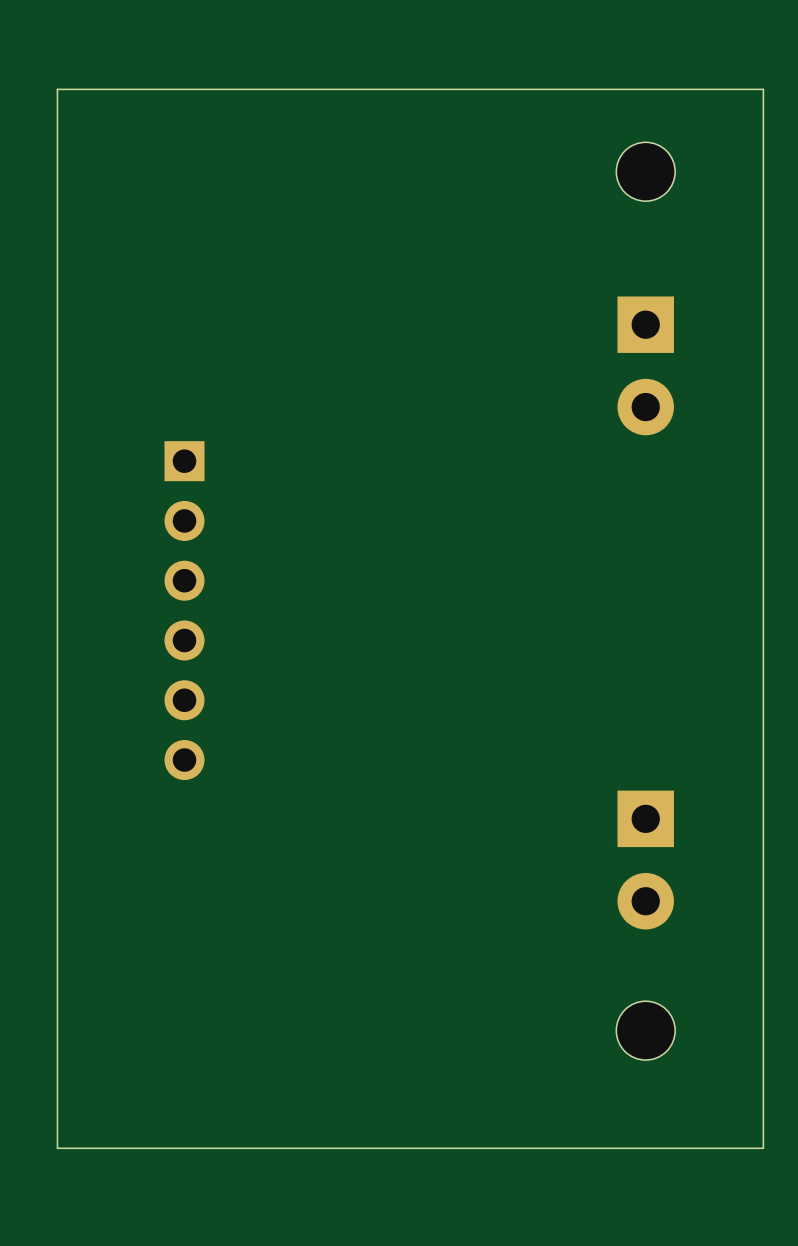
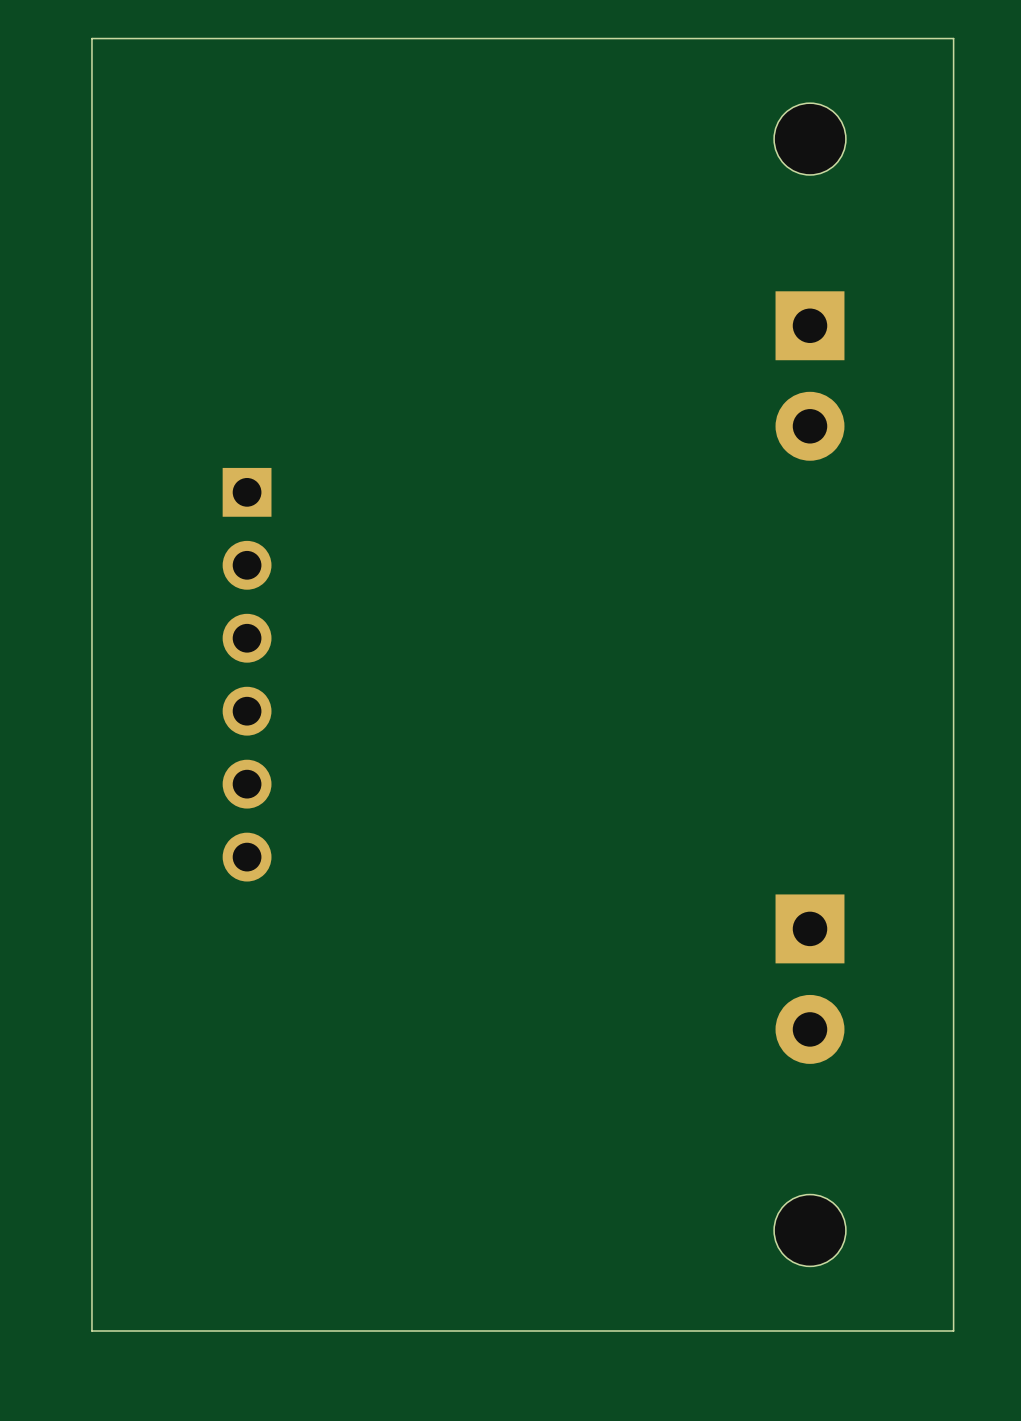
part position: (645, 1030) -> (810, 1230)

